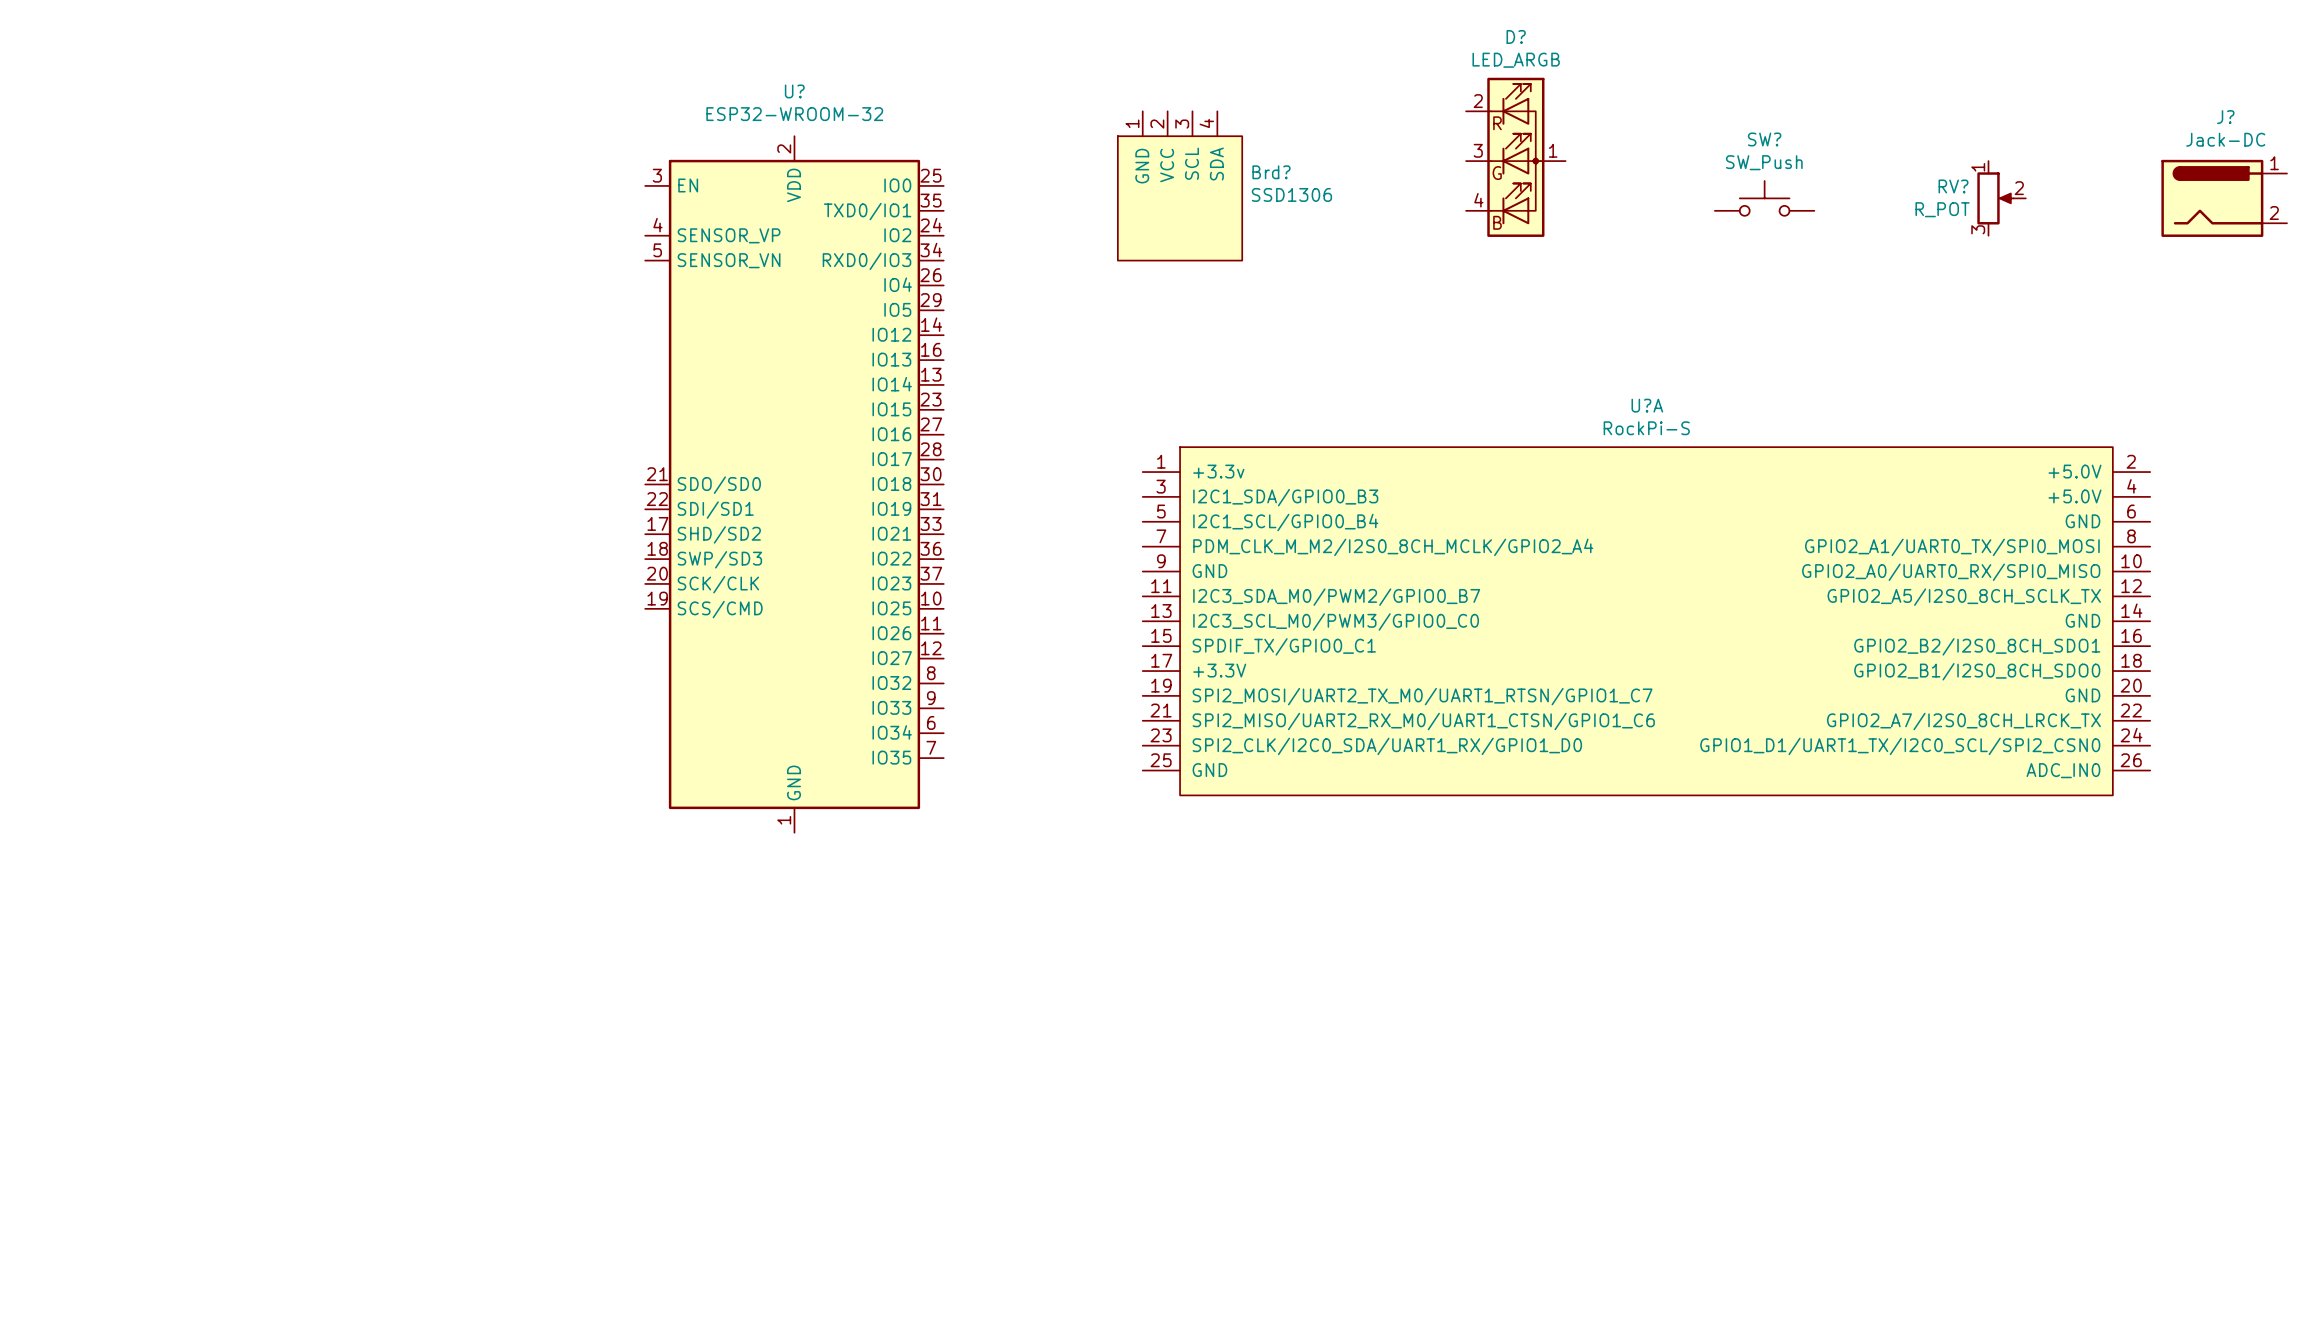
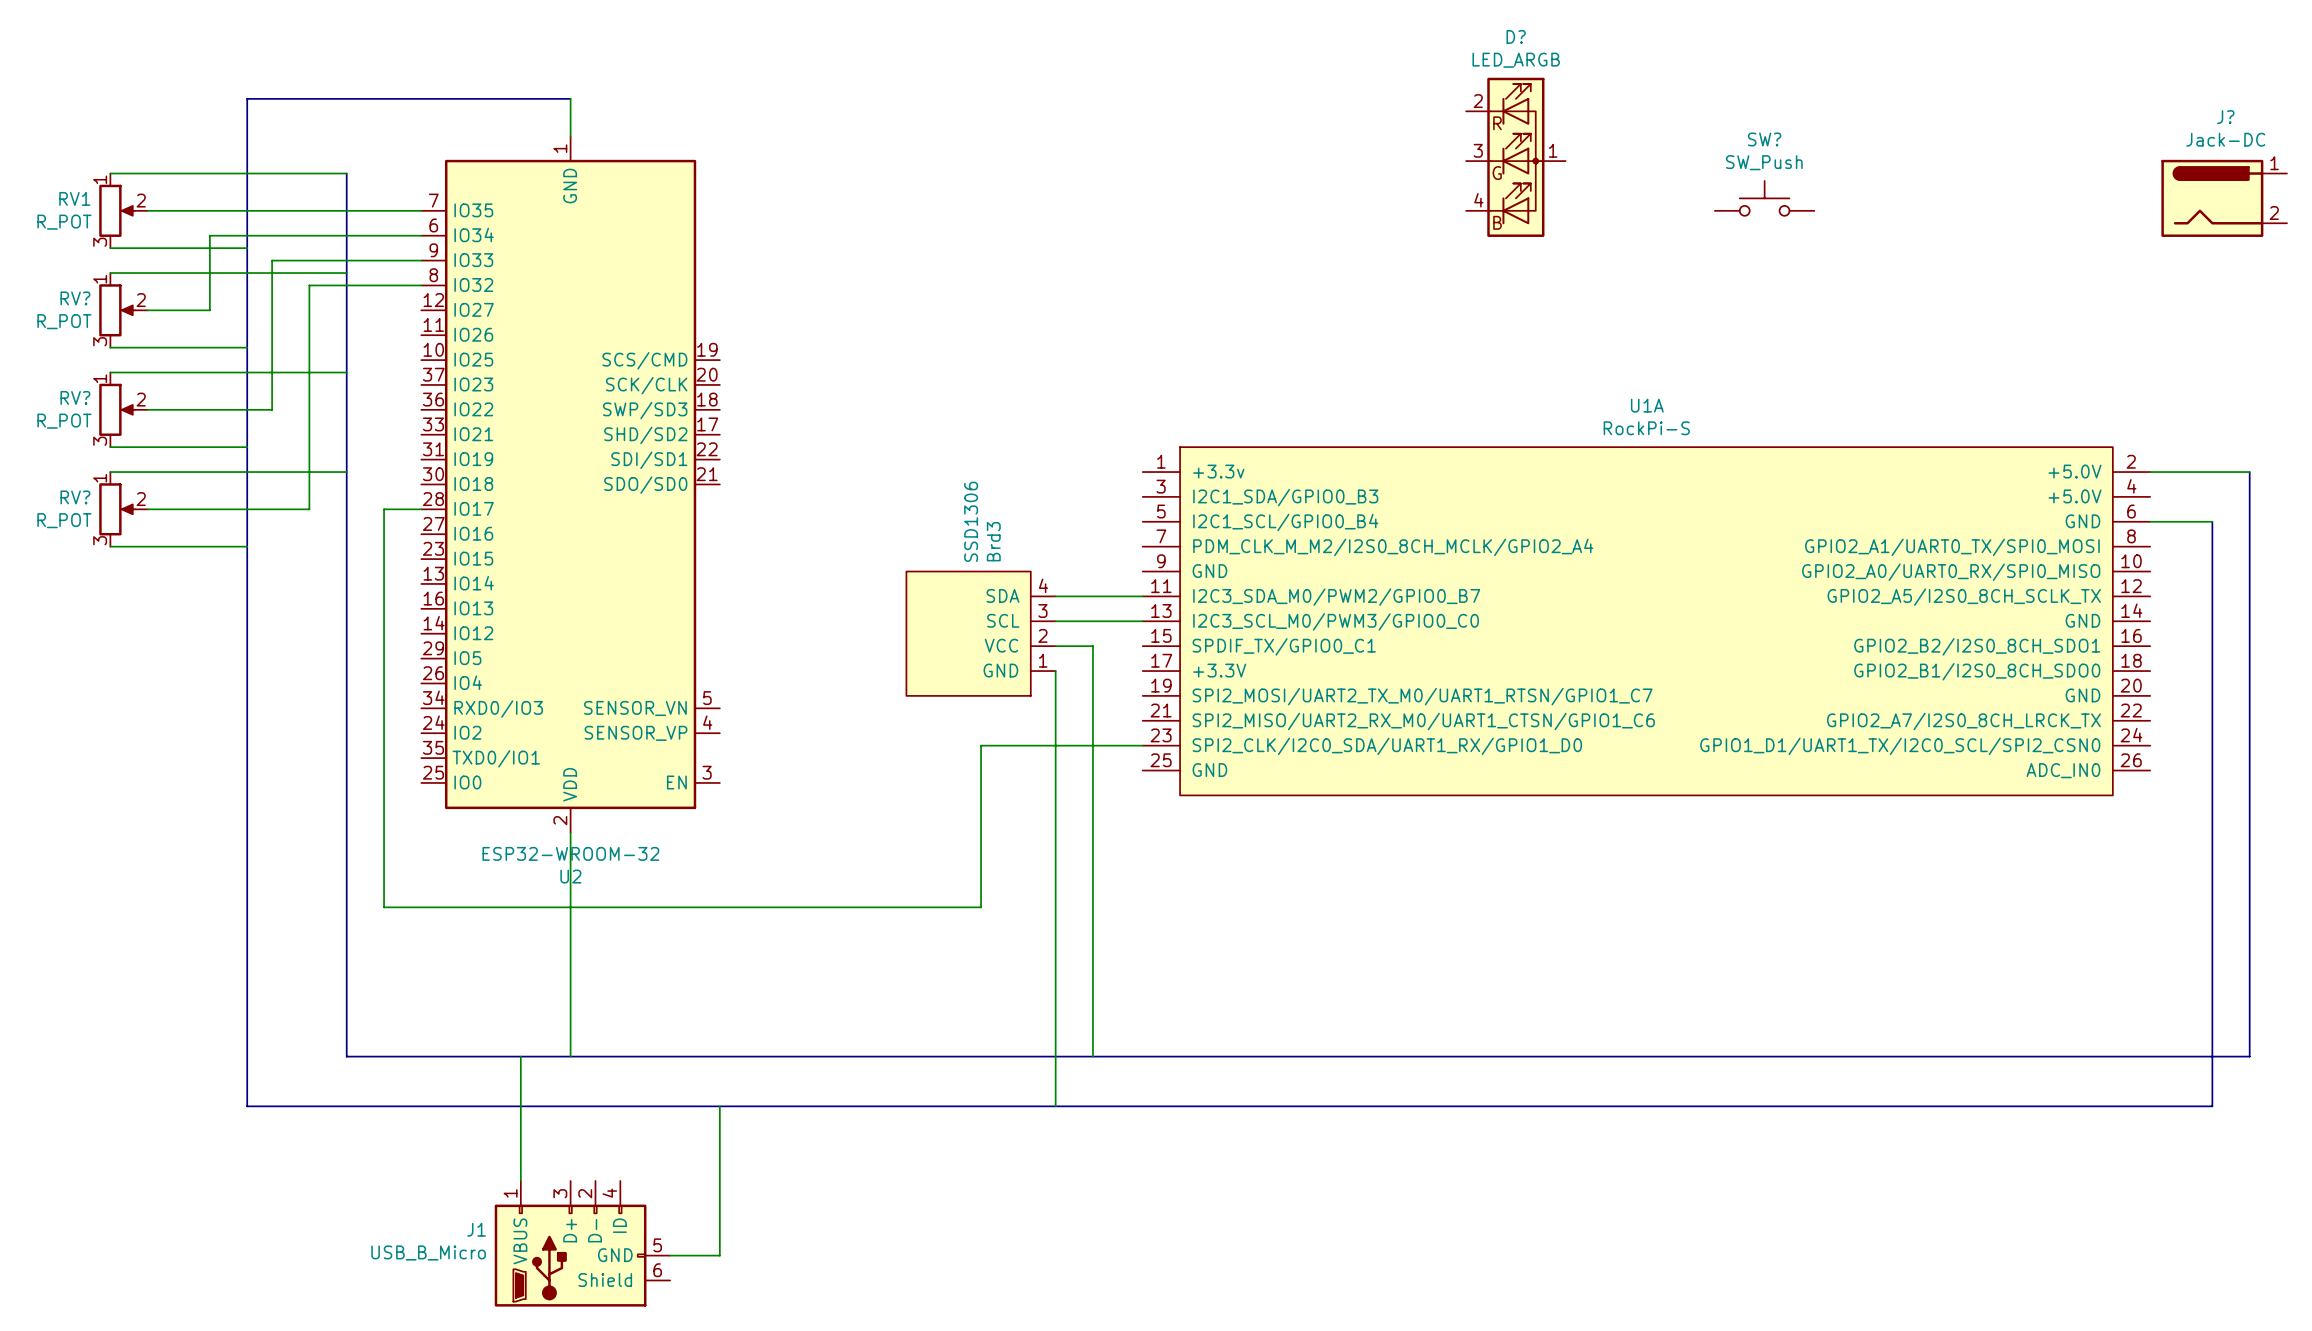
wire: none -> (570, 98) (570, 136)
bus: none -> (570, 98) (247, 98) (247, 1106) (2212, 1106) (2212, 521)
wire: none -> (110, 173) (346, 173)
bus: none -> (346, 173) (346, 1056) (2249, 1056) (2249, 472)
Brd?: SSD1306 (1180, 185) -> none
RV?: R_POT (2001, 198) -> none
RV1: none -> R_POT (123, 210)
wire: none -> (147, 210) (421, 210)
wire: none -> (421, 235) (209, 235) (209, 310) (147, 310)
wire: none -> (110, 248) (247, 248)
wire: none -> (421, 260) (272, 260) (272, 409) (147, 409)
wire: none -> (110, 273) (346, 273)
wire: none -> (421, 285) (309, 285) (309, 509) (147, 509)
RV?: none -> R_POT (123, 310)
wire: none -> (110, 347) (247, 347)
wire: none -> (110, 372) (346, 372)
U?A name: U?A (1647, 405) -> U1A (1647, 405)
RV?: none -> R_POT (123, 409)
wire: none -> (110, 447) (247, 447)
wire: none -> (110, 472) (346, 472)
wire: none -> (2150, 472) (2249, 472)
U2: none -> ESP32-WROOM-32 (570, 484)
U?: ESP32-WROOM-32 (794, 484) -> none
RV?: none -> R_POT (123, 509)
wire: none -> (421, 509) (384, 509) (384, 907) (981, 907) (981, 745) (1142, 745)
wire: none -> (2150, 521) (2212, 521)
wire: none -> (110, 546) (247, 546)
wire: none -> (1055, 596) (1142, 596)
wire: none -> (1055, 621) (1142, 621)
Brd3: none -> SSD1306 (981, 633)
wire: none -> (1055, 646) (1092, 646) (1092, 1056)
wire: none -> (1055, 671) (1055, 1106)
wire: none -> (570, 832) (570, 1056)
wire: none -> (520, 1056) (520, 1180)
wire: none -> (719, 1106) (719, 1255) (670, 1255)
J1: none -> USB_B_Micro (582, 1243)

